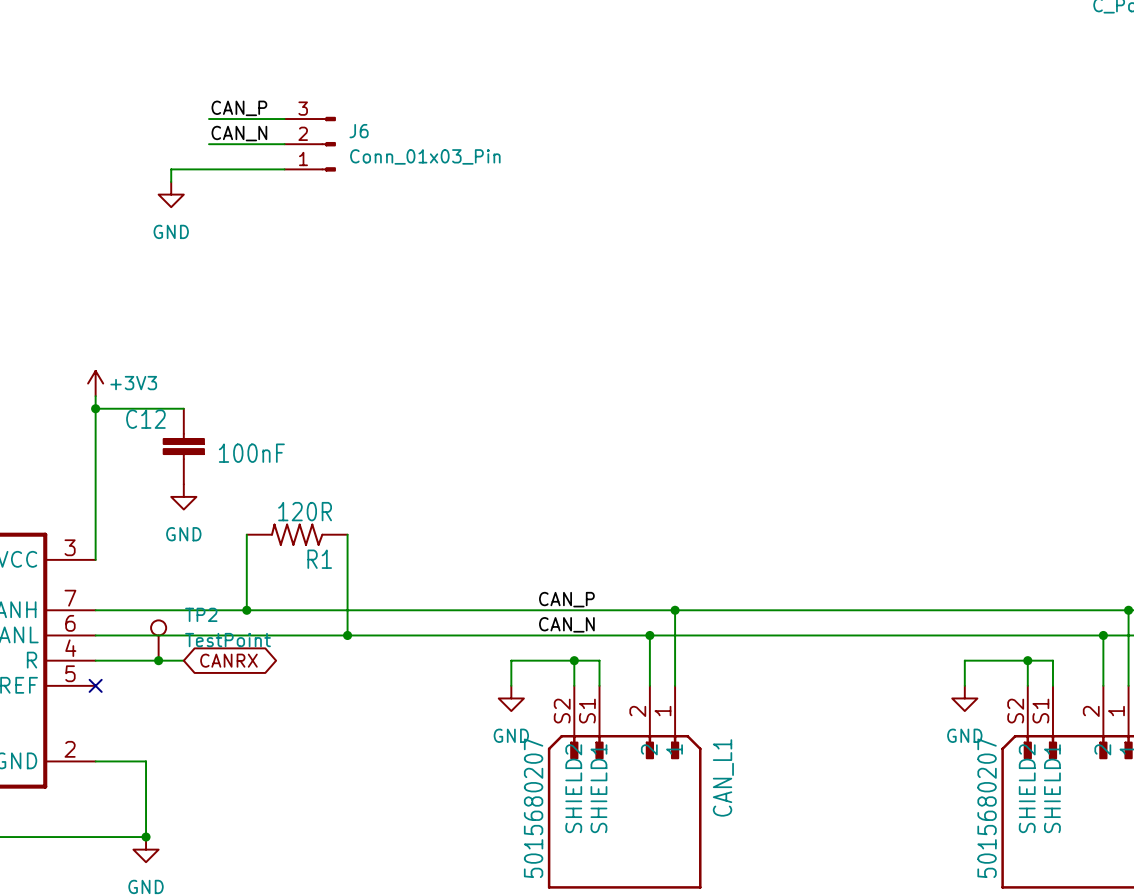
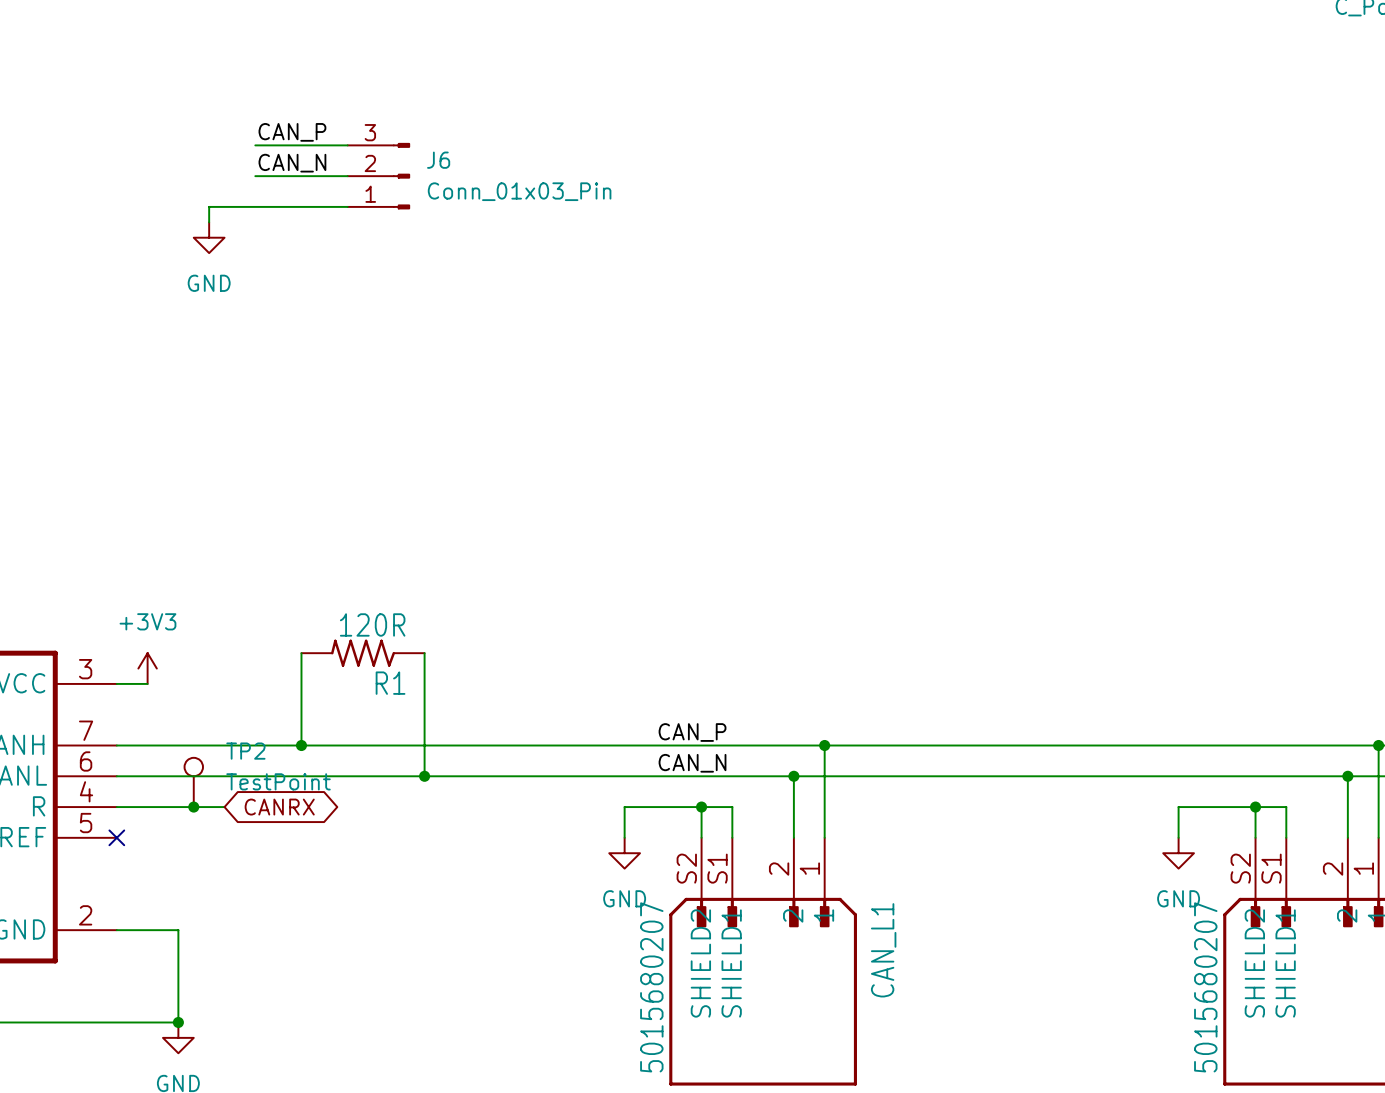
power symbol position: +3V3 (95, 383) -> +3V3 (147, 668)
power symbol text position: +3V3 (133, 383) -> +3V3 (147, 621)
wire: (95, 396) (95, 559) -> (147, 683) (116, 683)
wire: (95, 408) (183, 408) -> none
junction: (95, 408) -> none
C12: 100nF (183, 446) -> none
power symbol: GND (183, 496) -> none

